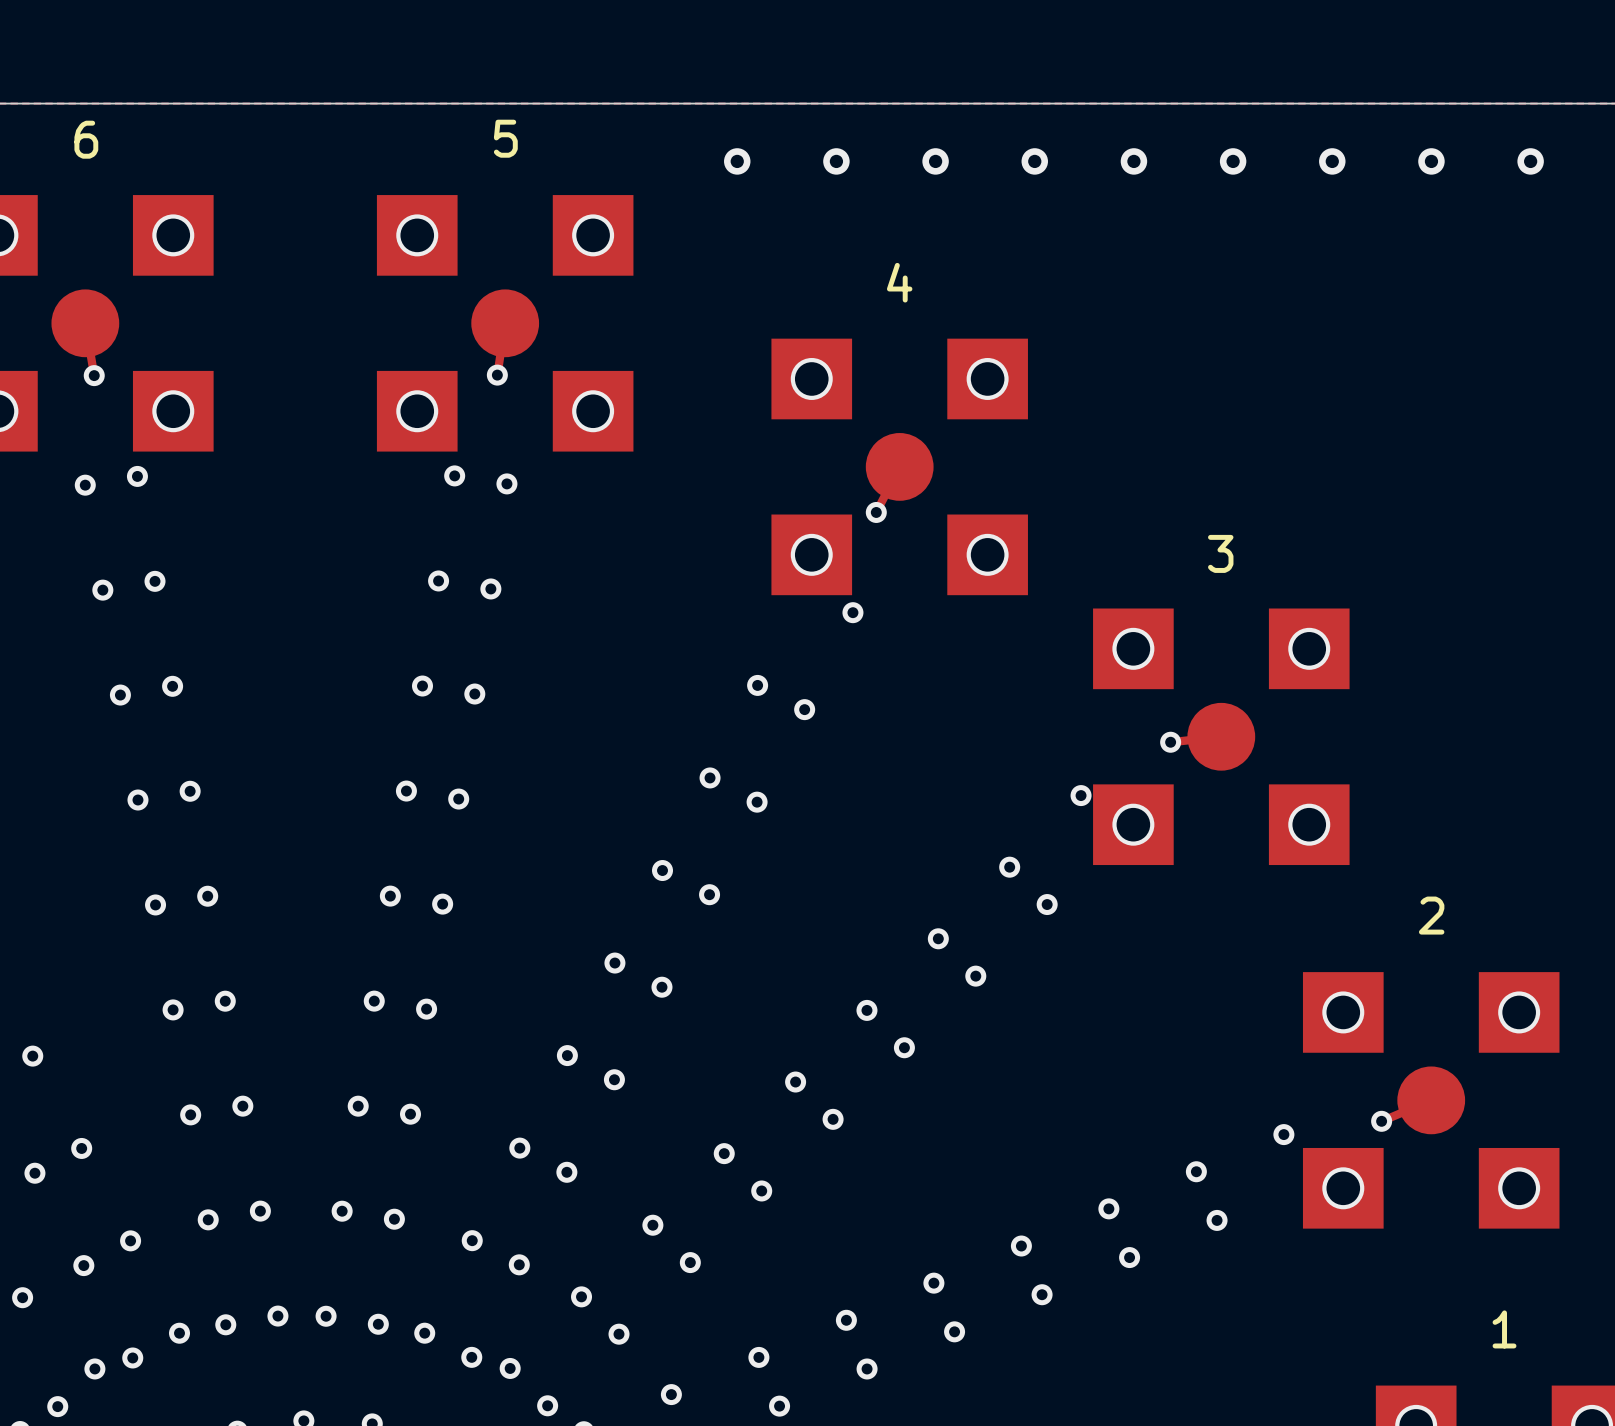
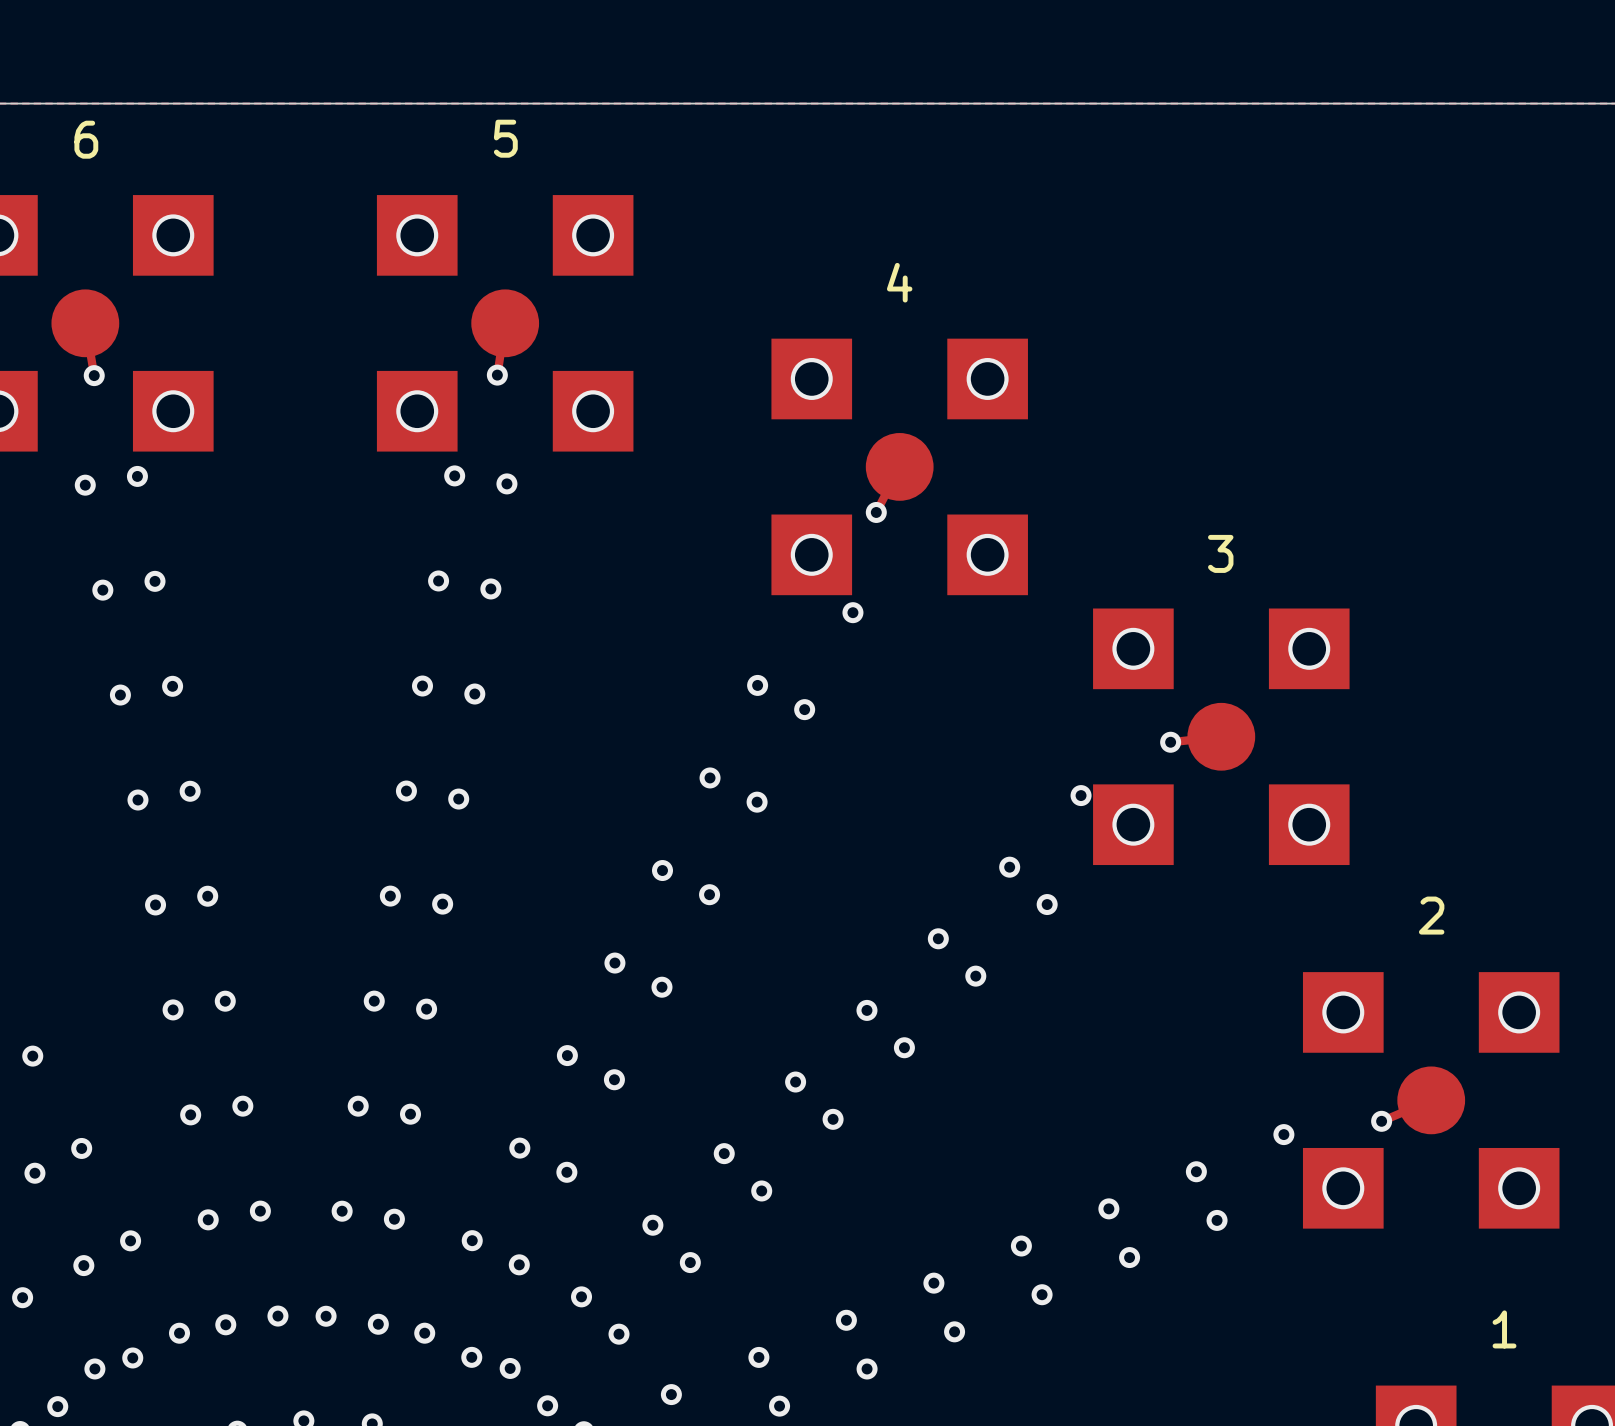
via: (737, 161) -> none
via: (836, 161) -> none
via: (935, 161) -> none
via: (1034, 161) -> none
via: (1133, 161) -> none
via: (1233, 161) -> none
via: (1332, 161) -> none
via: (1431, 161) -> none
via: (1530, 161) -> none

